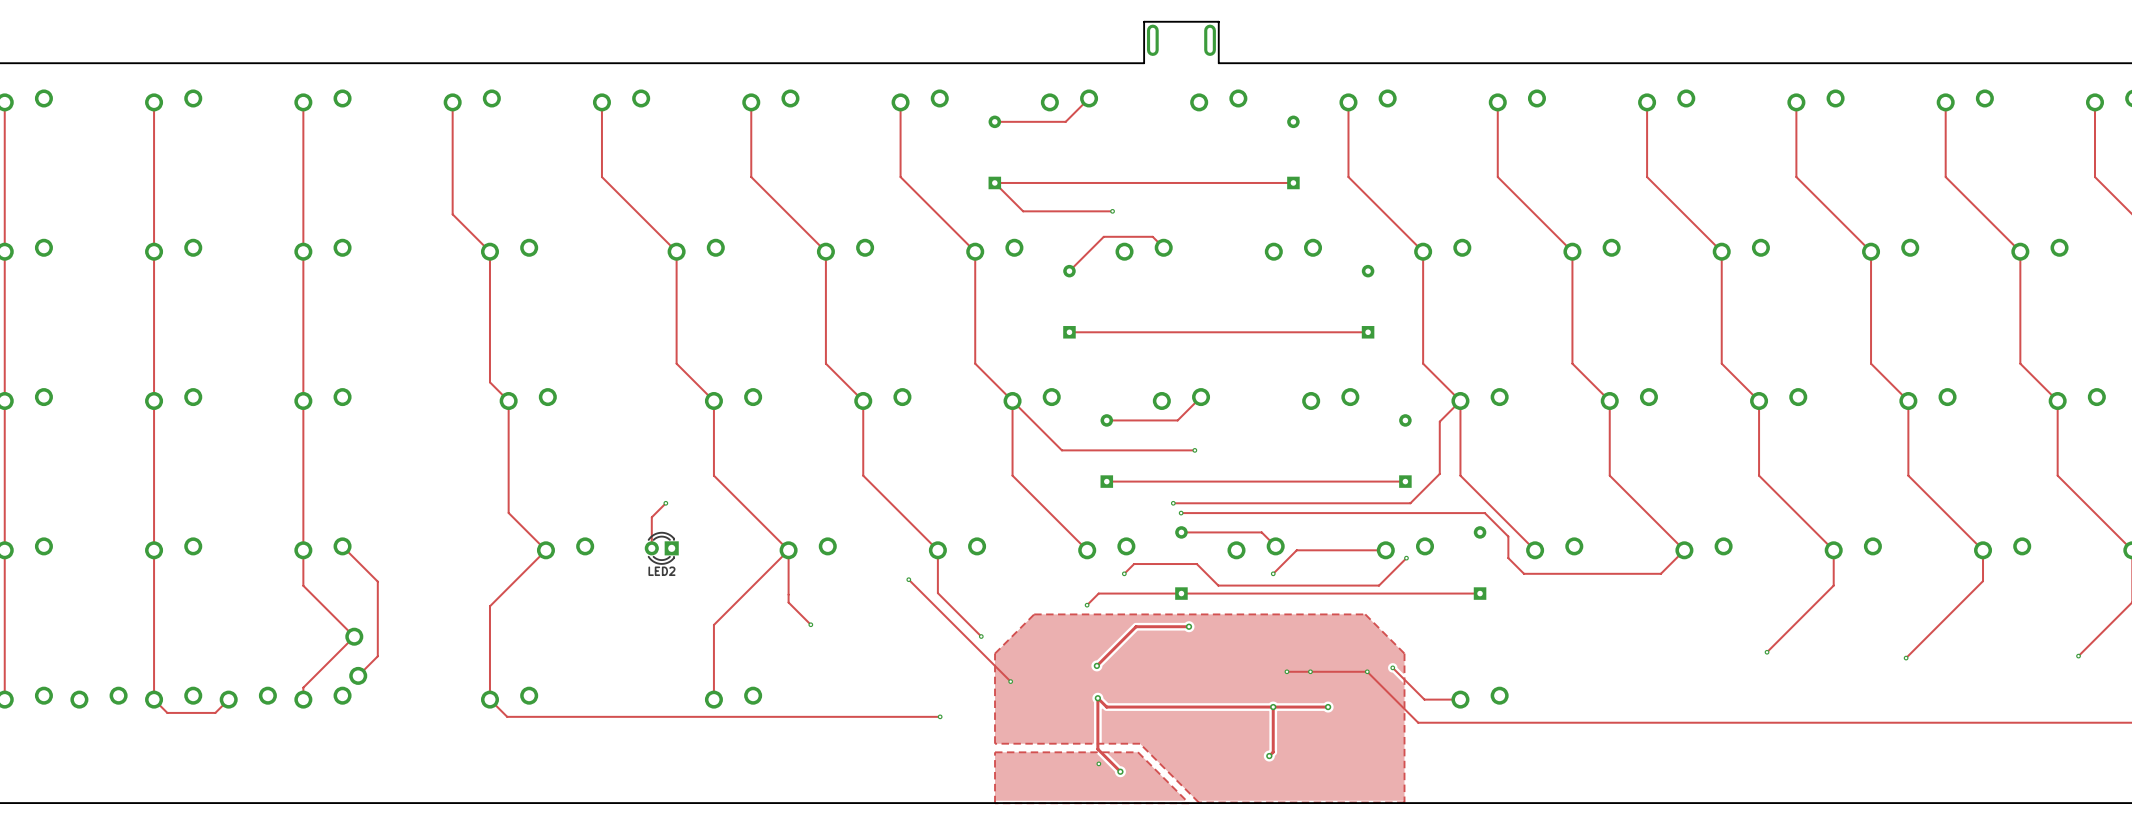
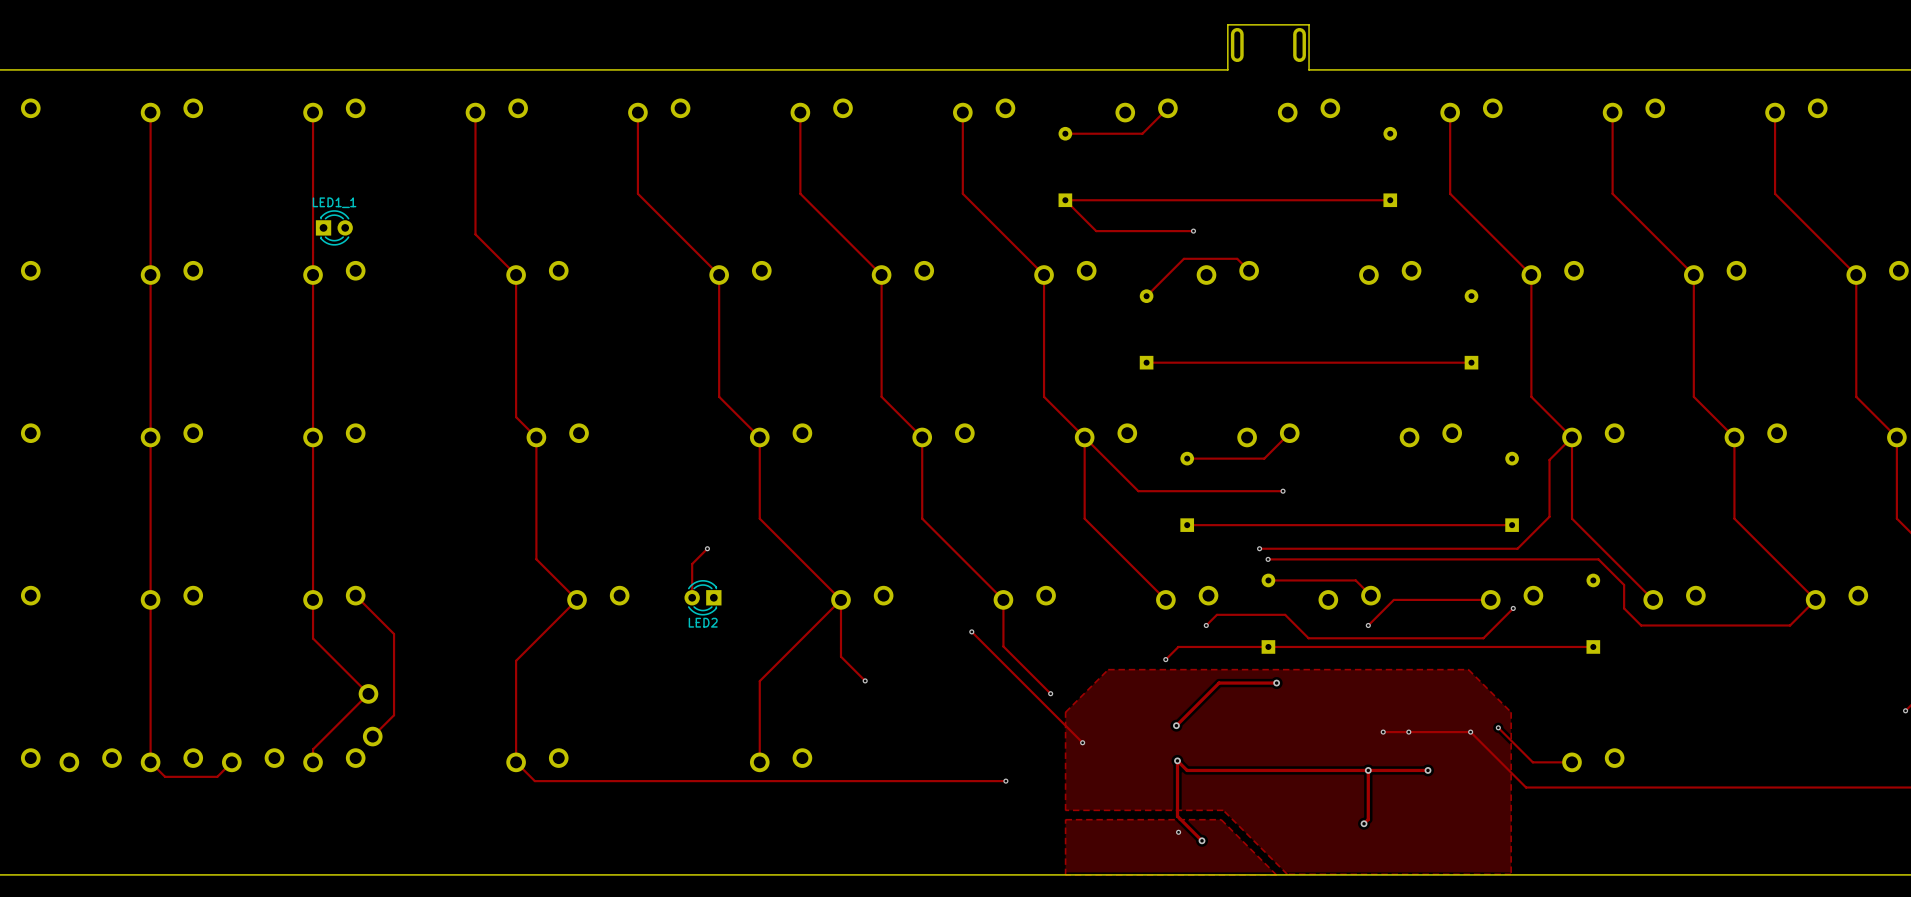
LED1_1: none -> (334, 227)

